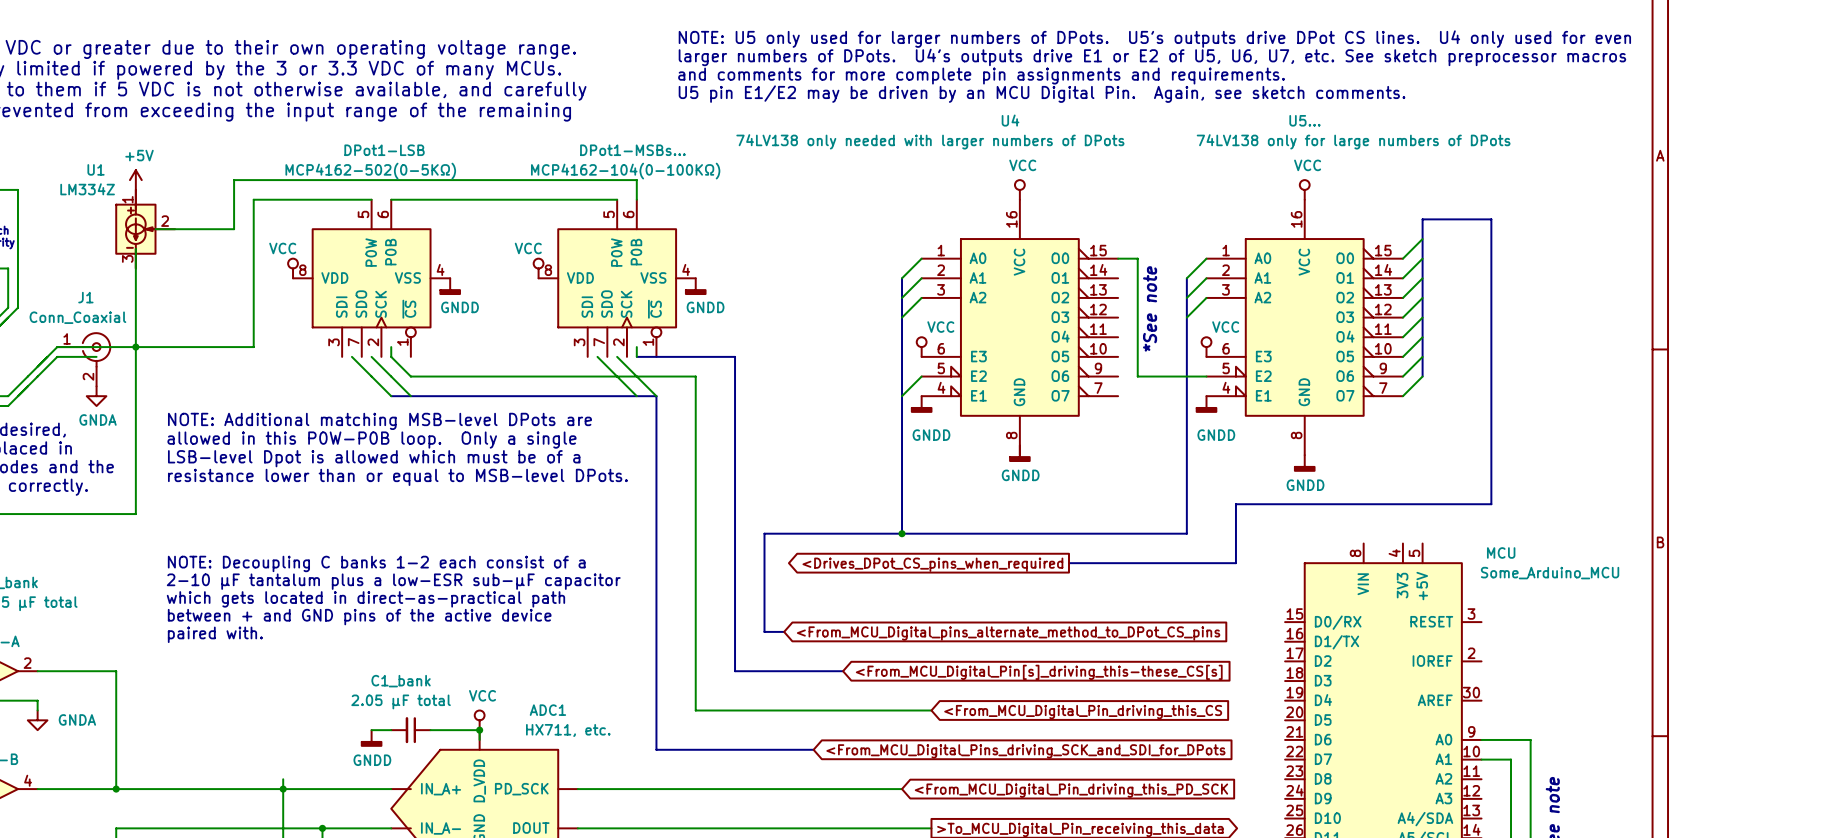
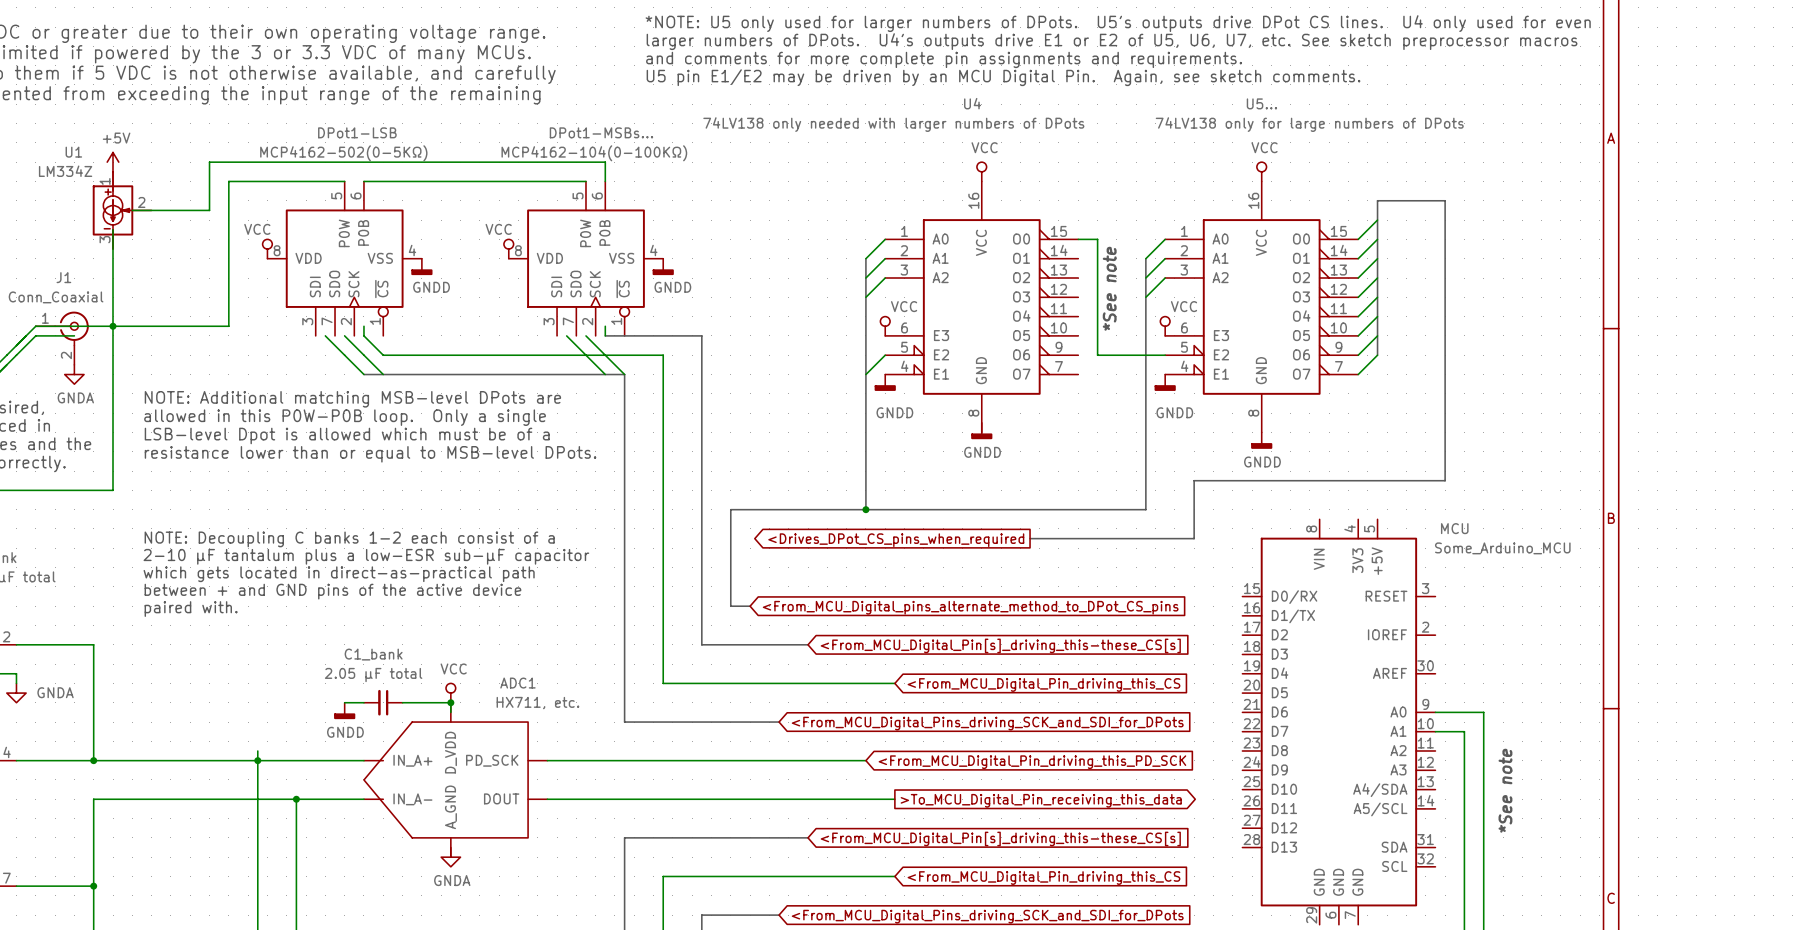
text: NOTE: U5 only used for larger numbers of DPots. U5's outputs drive DPot CS lines. U4 only used for even (1154, 39) -> *NOTE: U5 only used for larger numbers of DPots. U5's outputs drive DPot CS lines. U4 only used for even (1118, 23)

